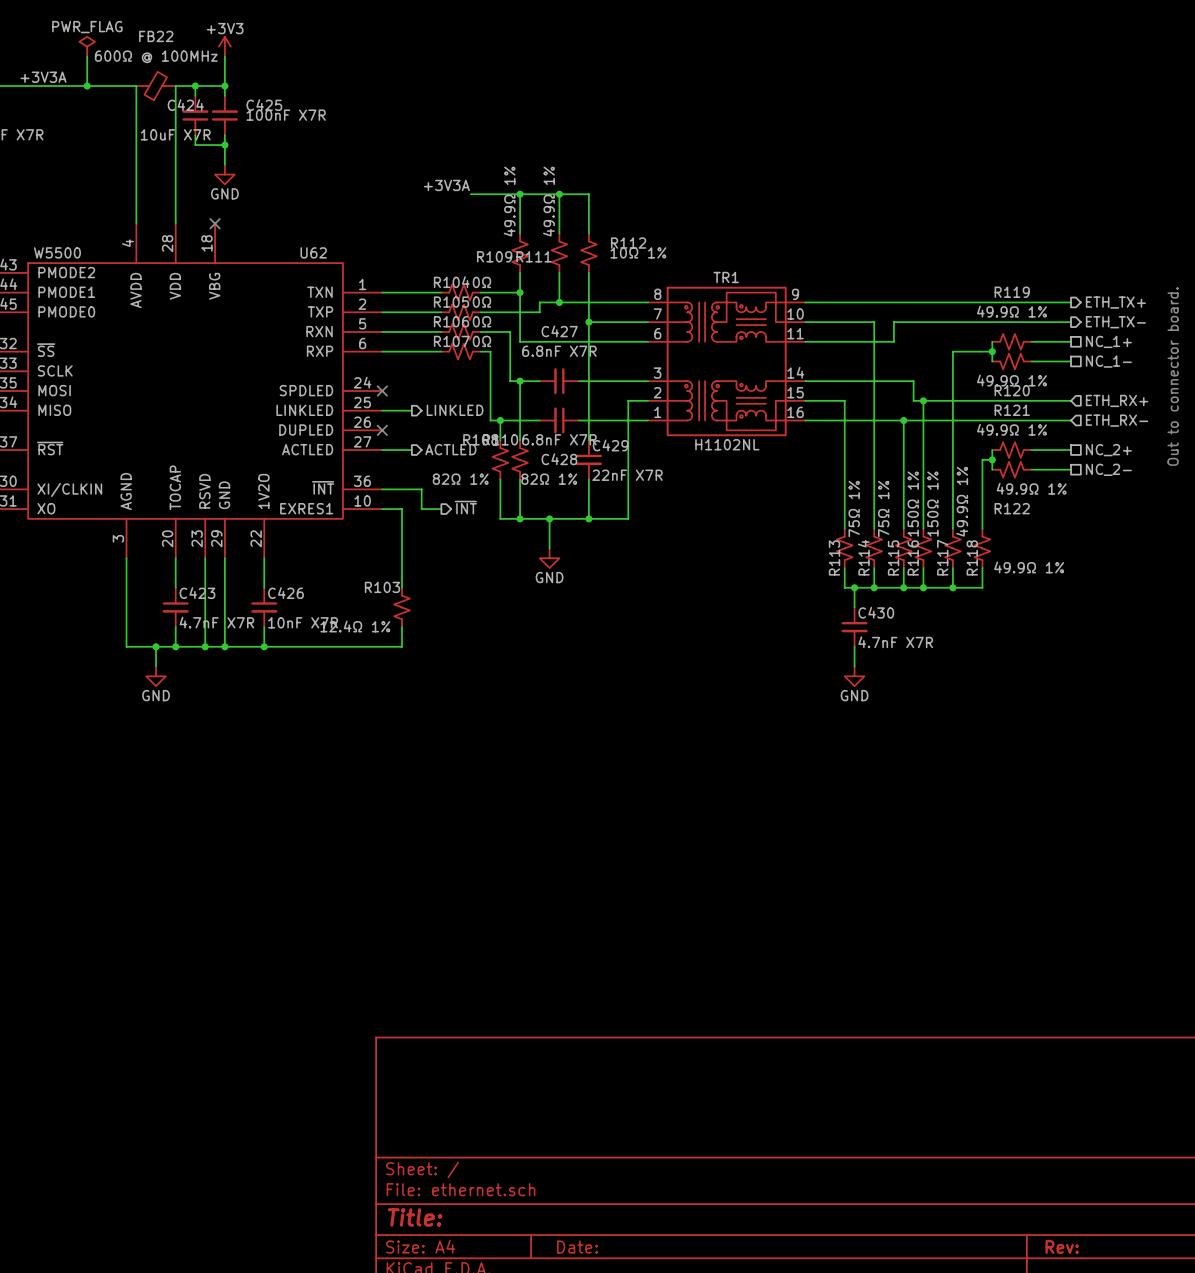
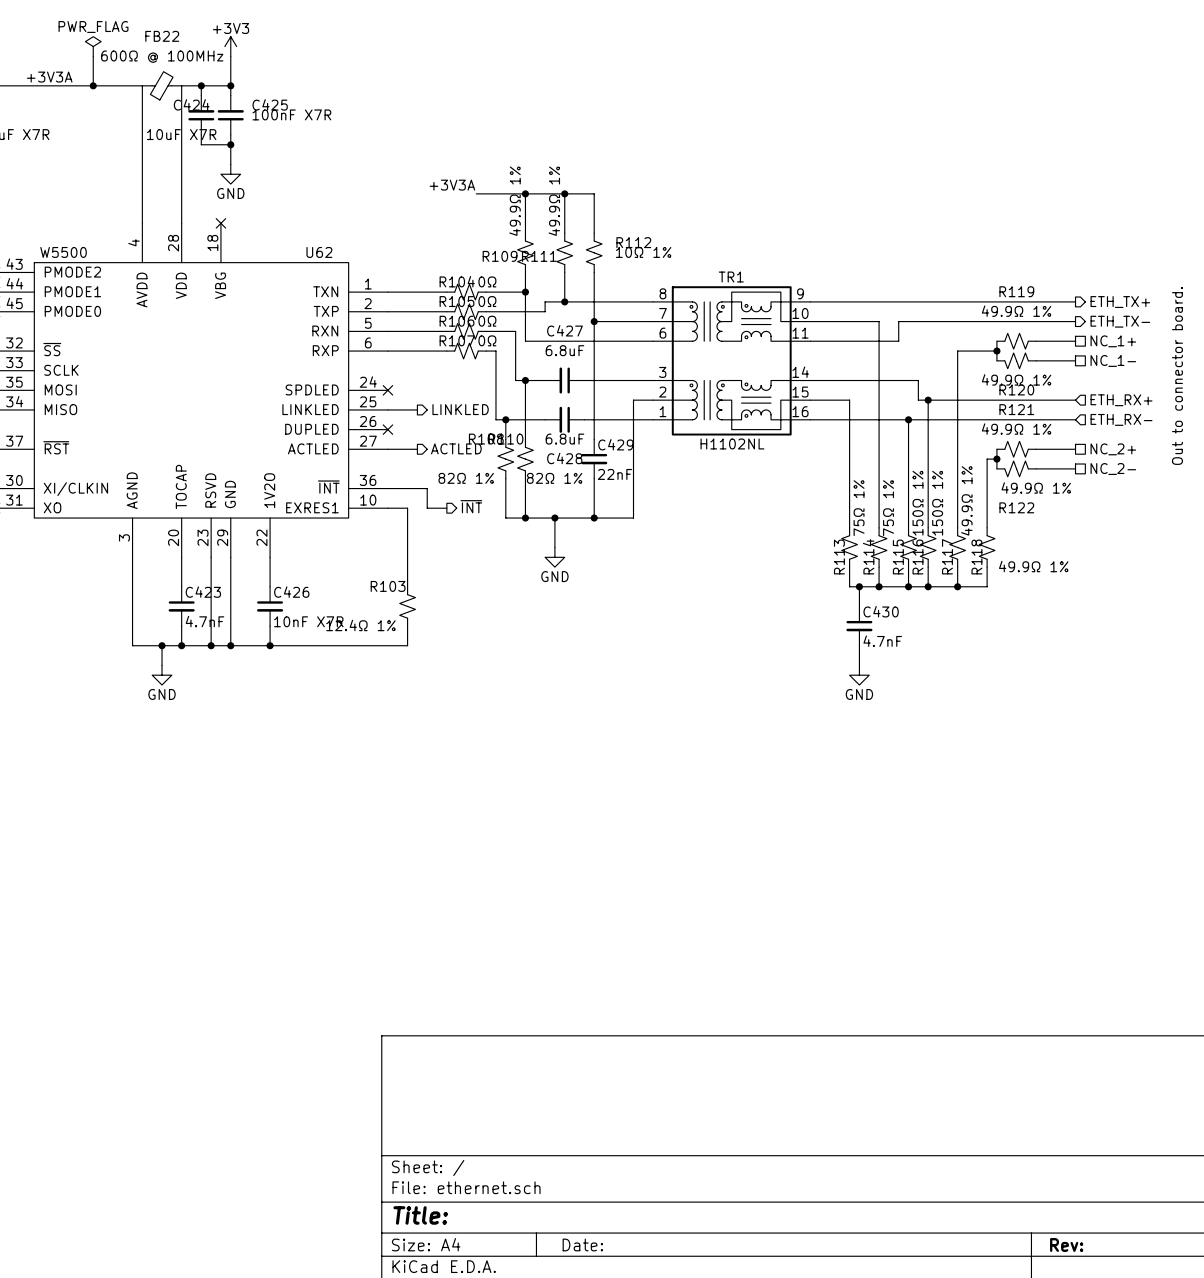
C427 value: 6.8nF X7R (559, 351) -> 6.8uF (564, 350)
C428 value: 6.8nF X7R (559, 439) -> 6.8uF (564, 439)
C429 value: 22nF X7R (627, 475) -> 22nF (614, 474)
C423 value: 4.7nF X7R (216, 622) -> 4.7nF (204, 621)
C430 value: 4.7nF X7R (895, 642) -> 4.7nF (882, 641)

